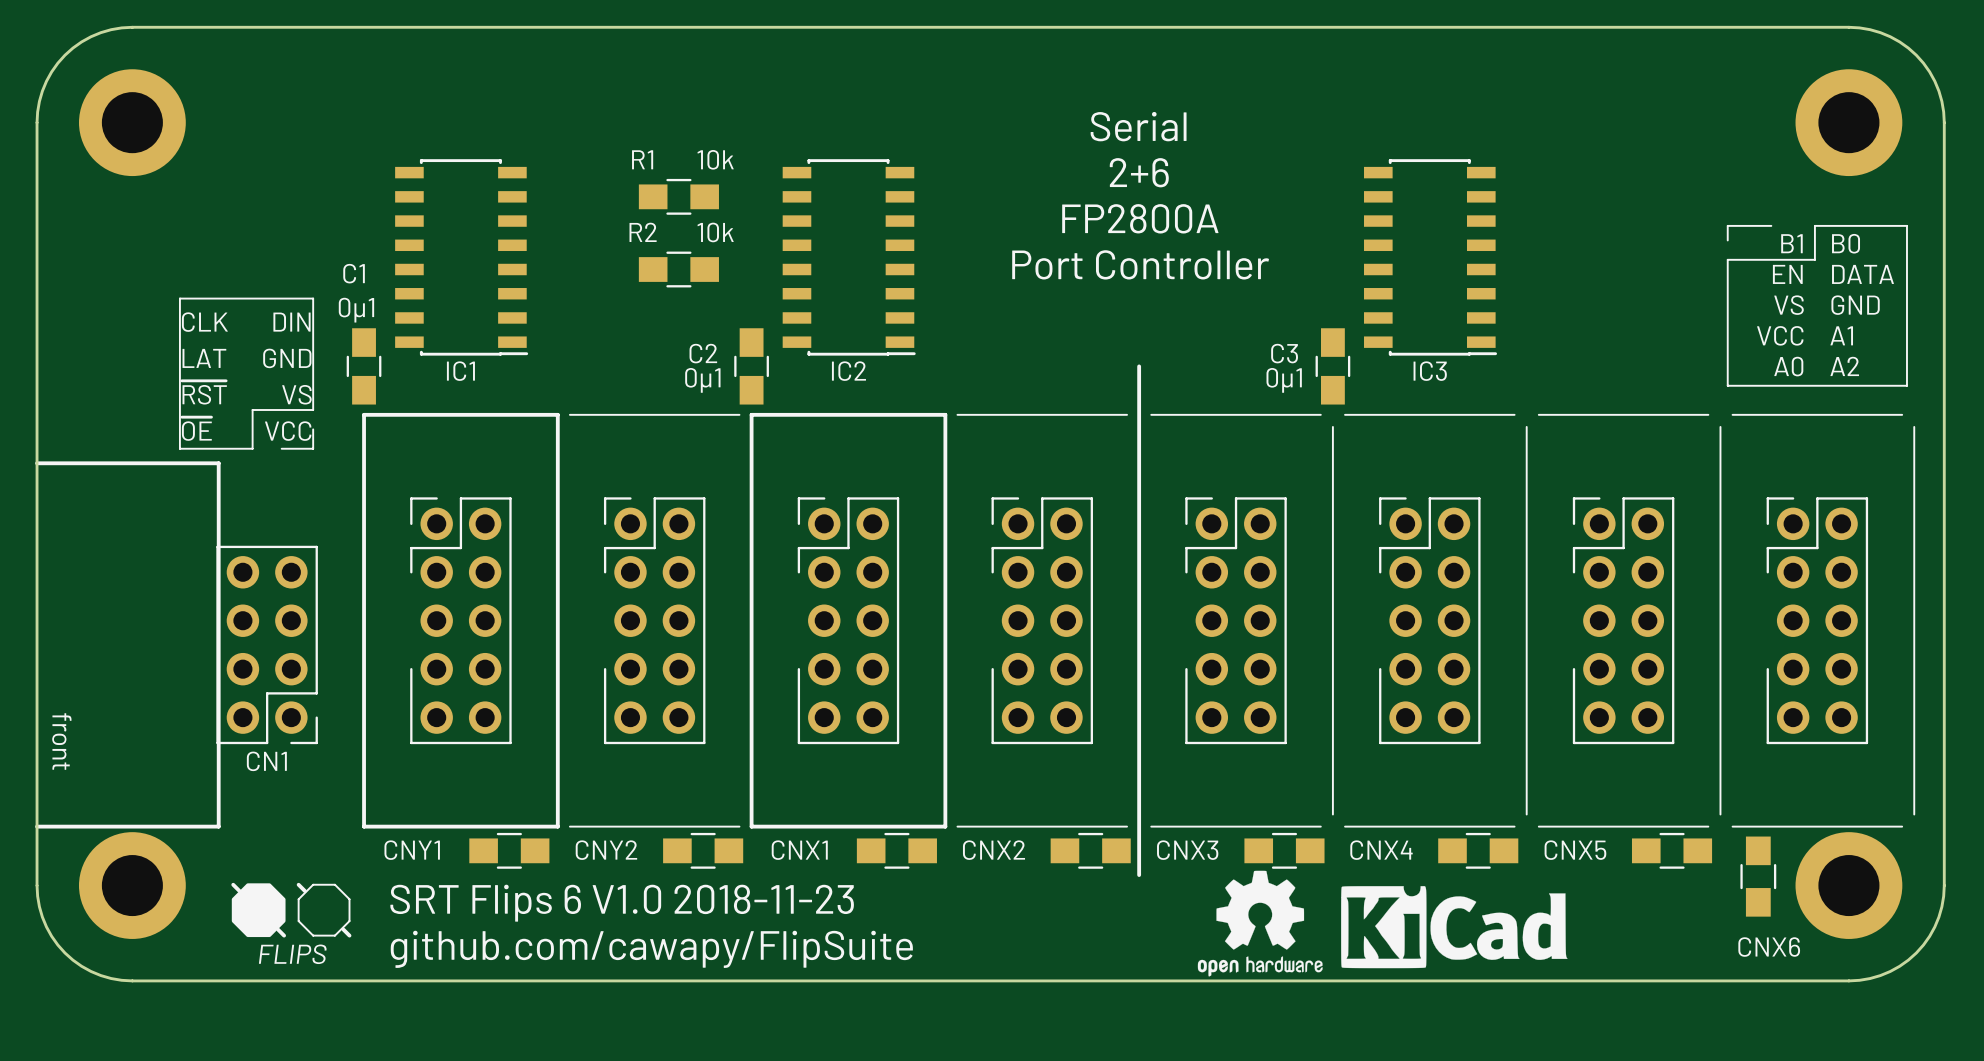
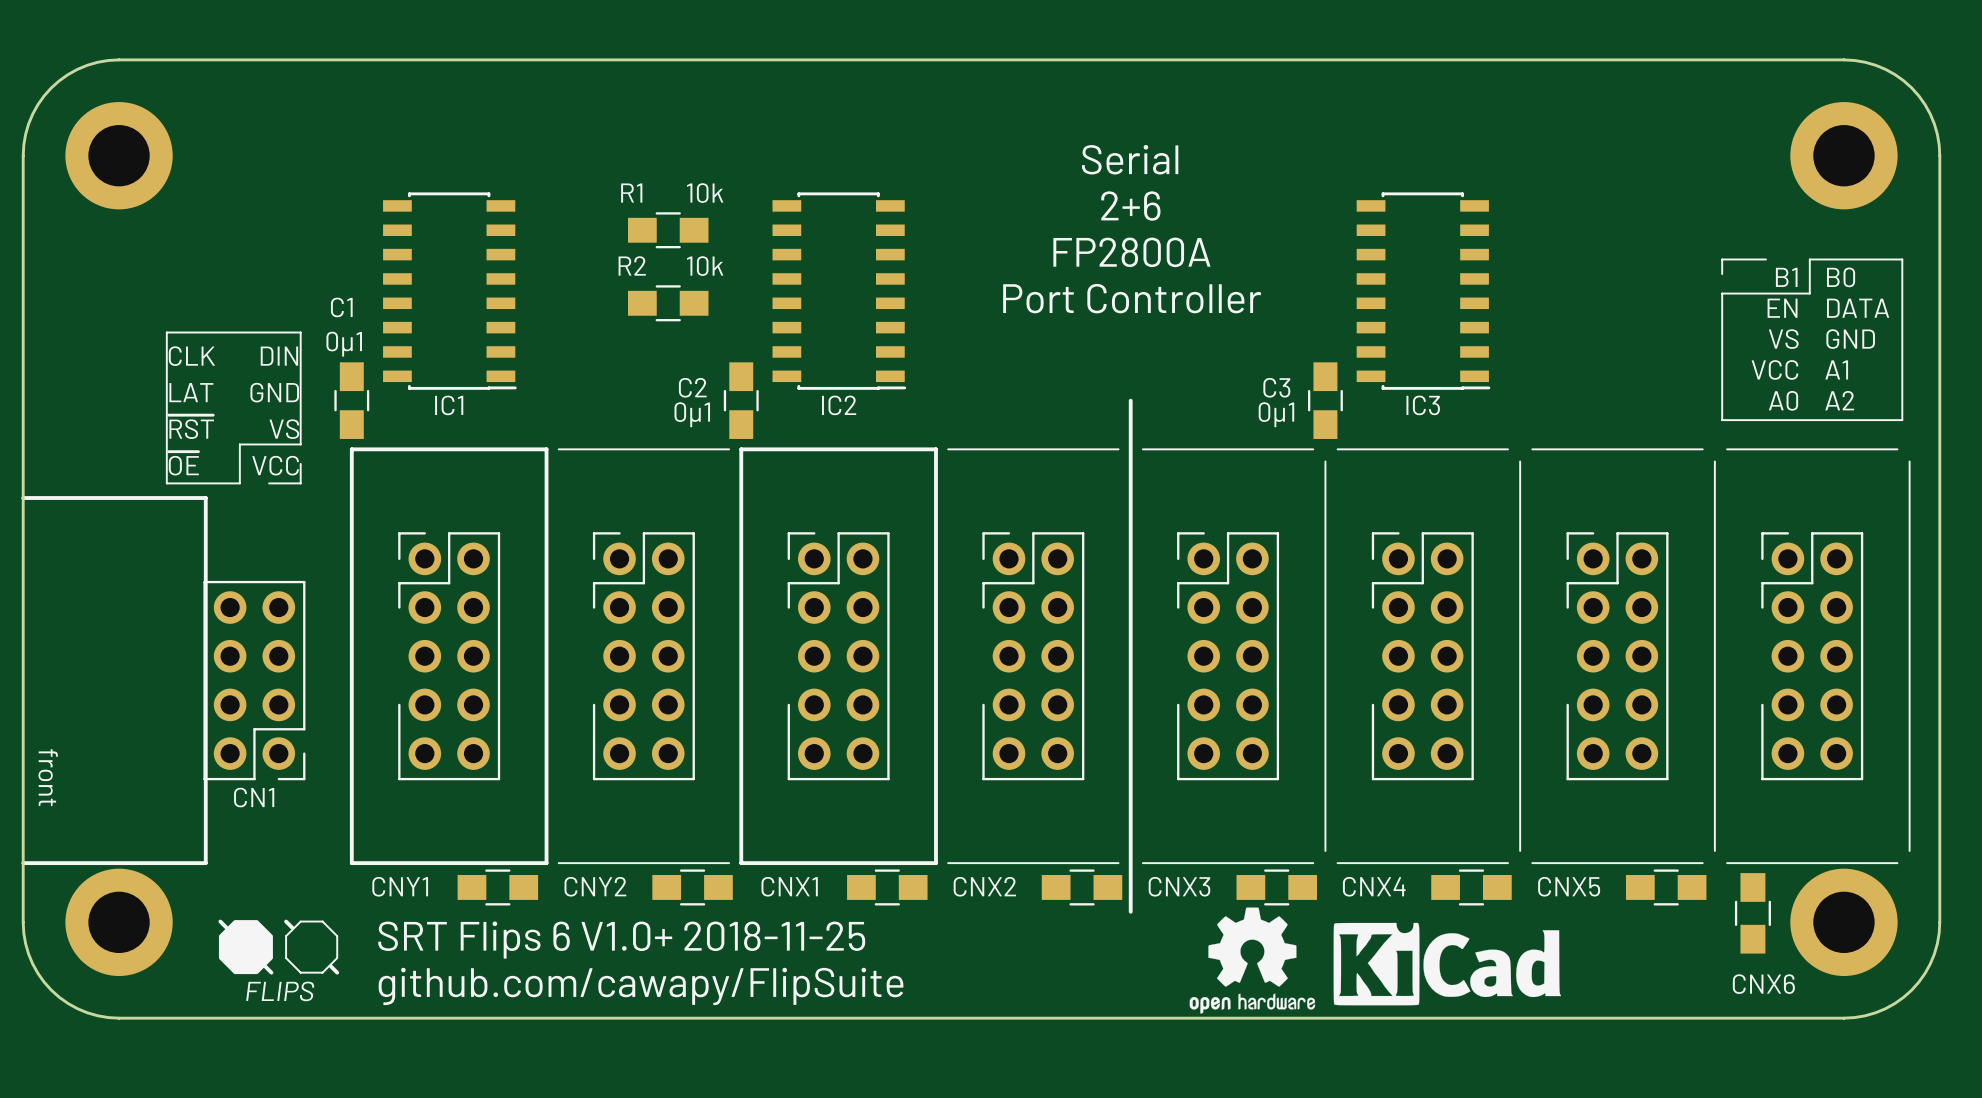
text: SRT Flips 6 V1.0 2018-11-23 (622, 903) -> SRT Flips 6 V1.0+ 2018-11-25 (621, 940)

